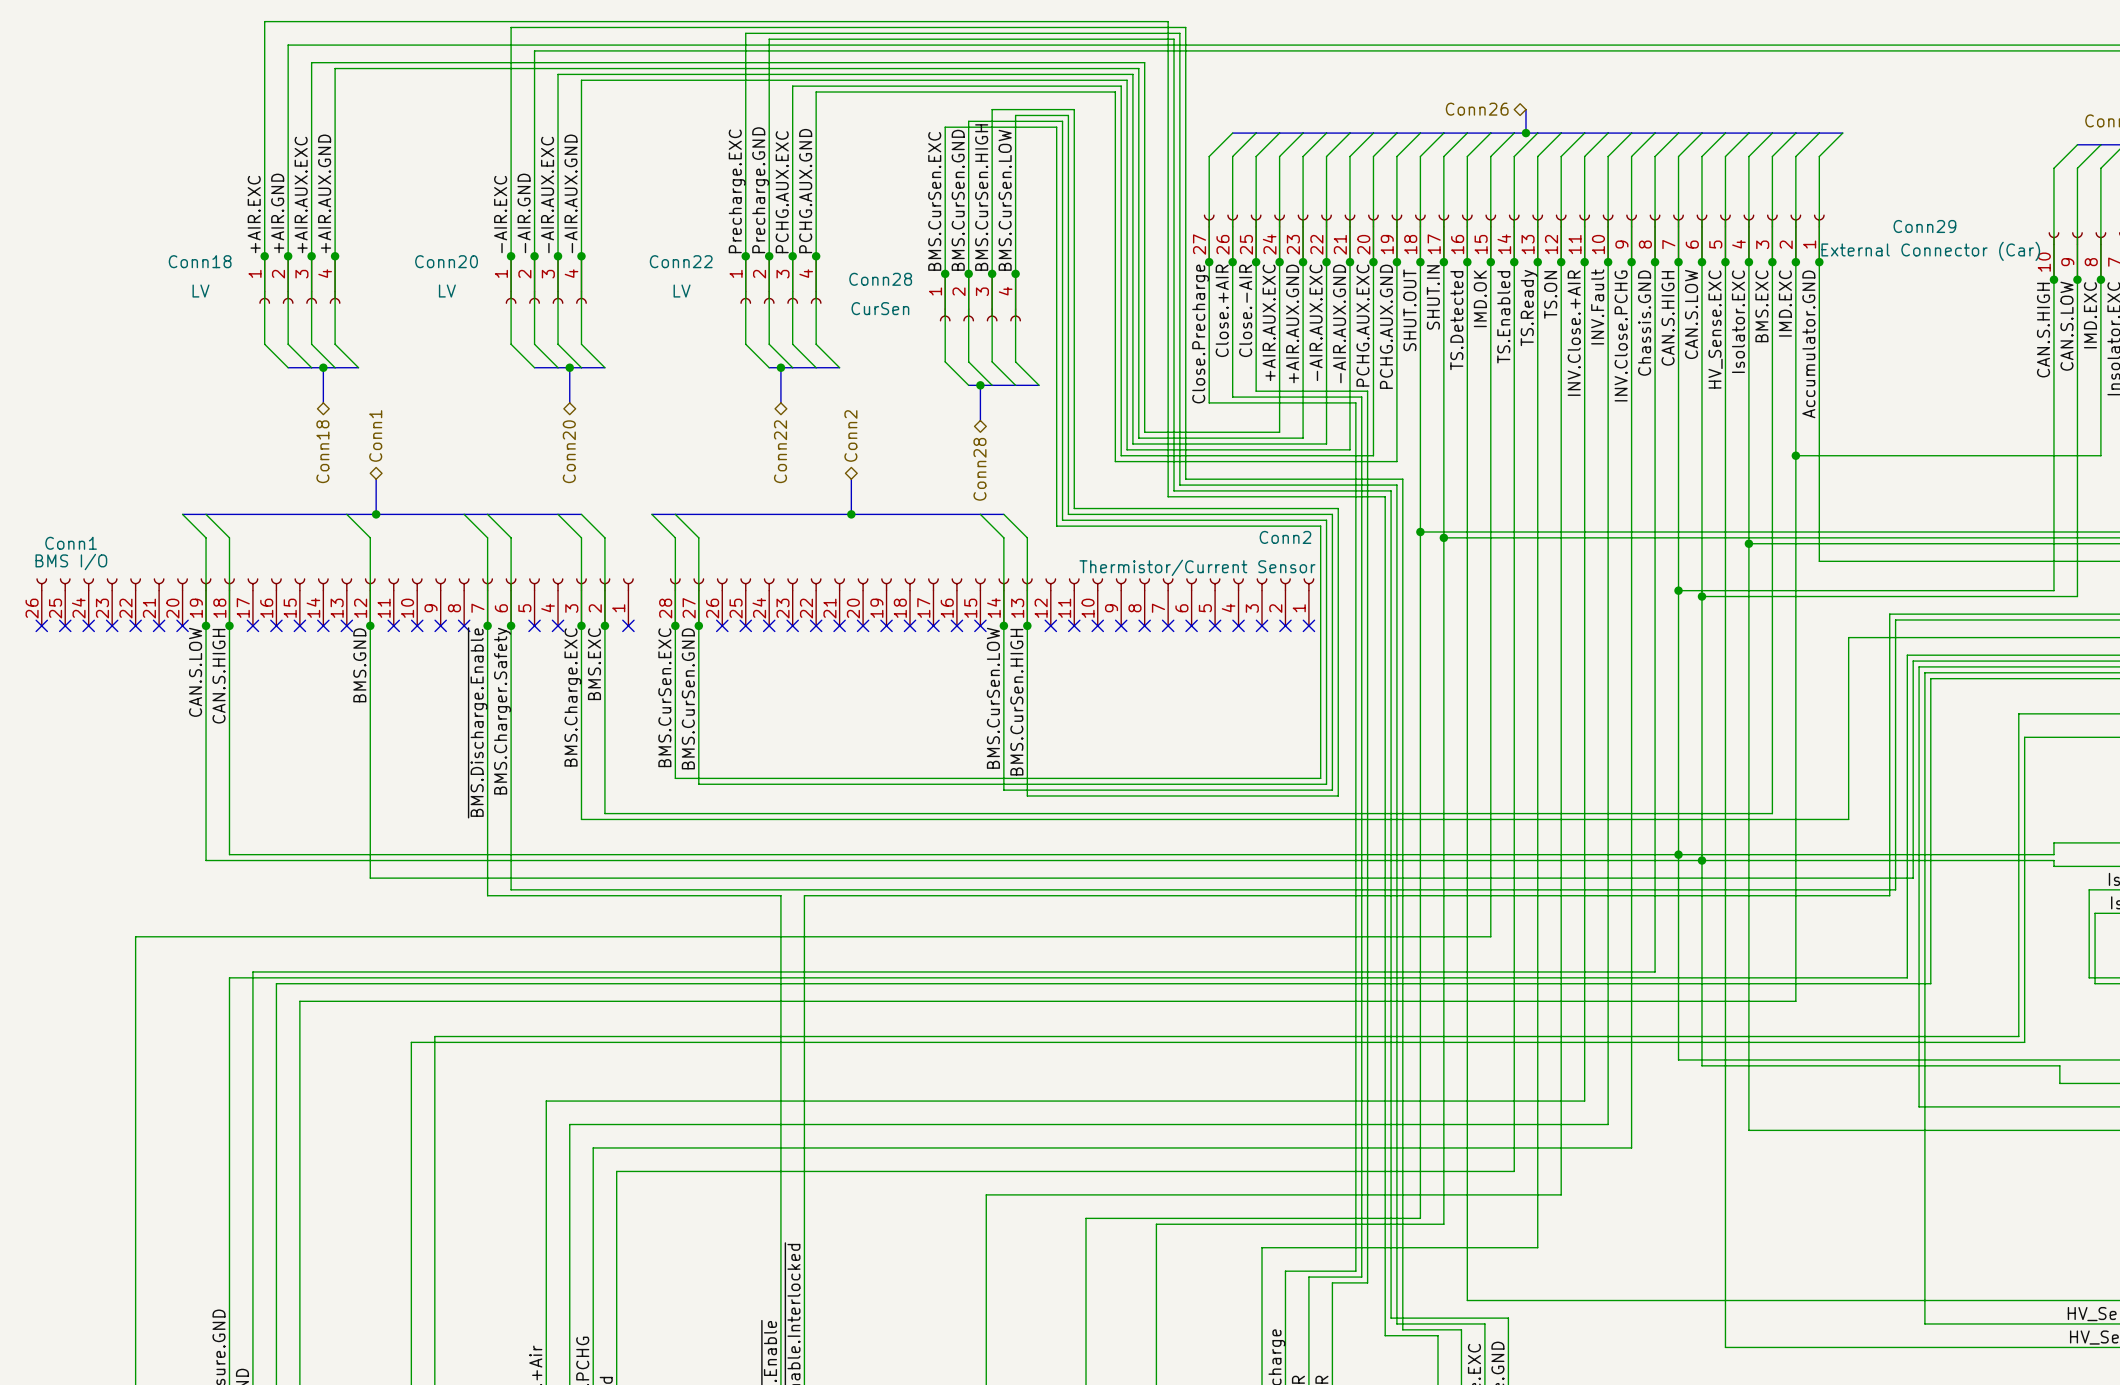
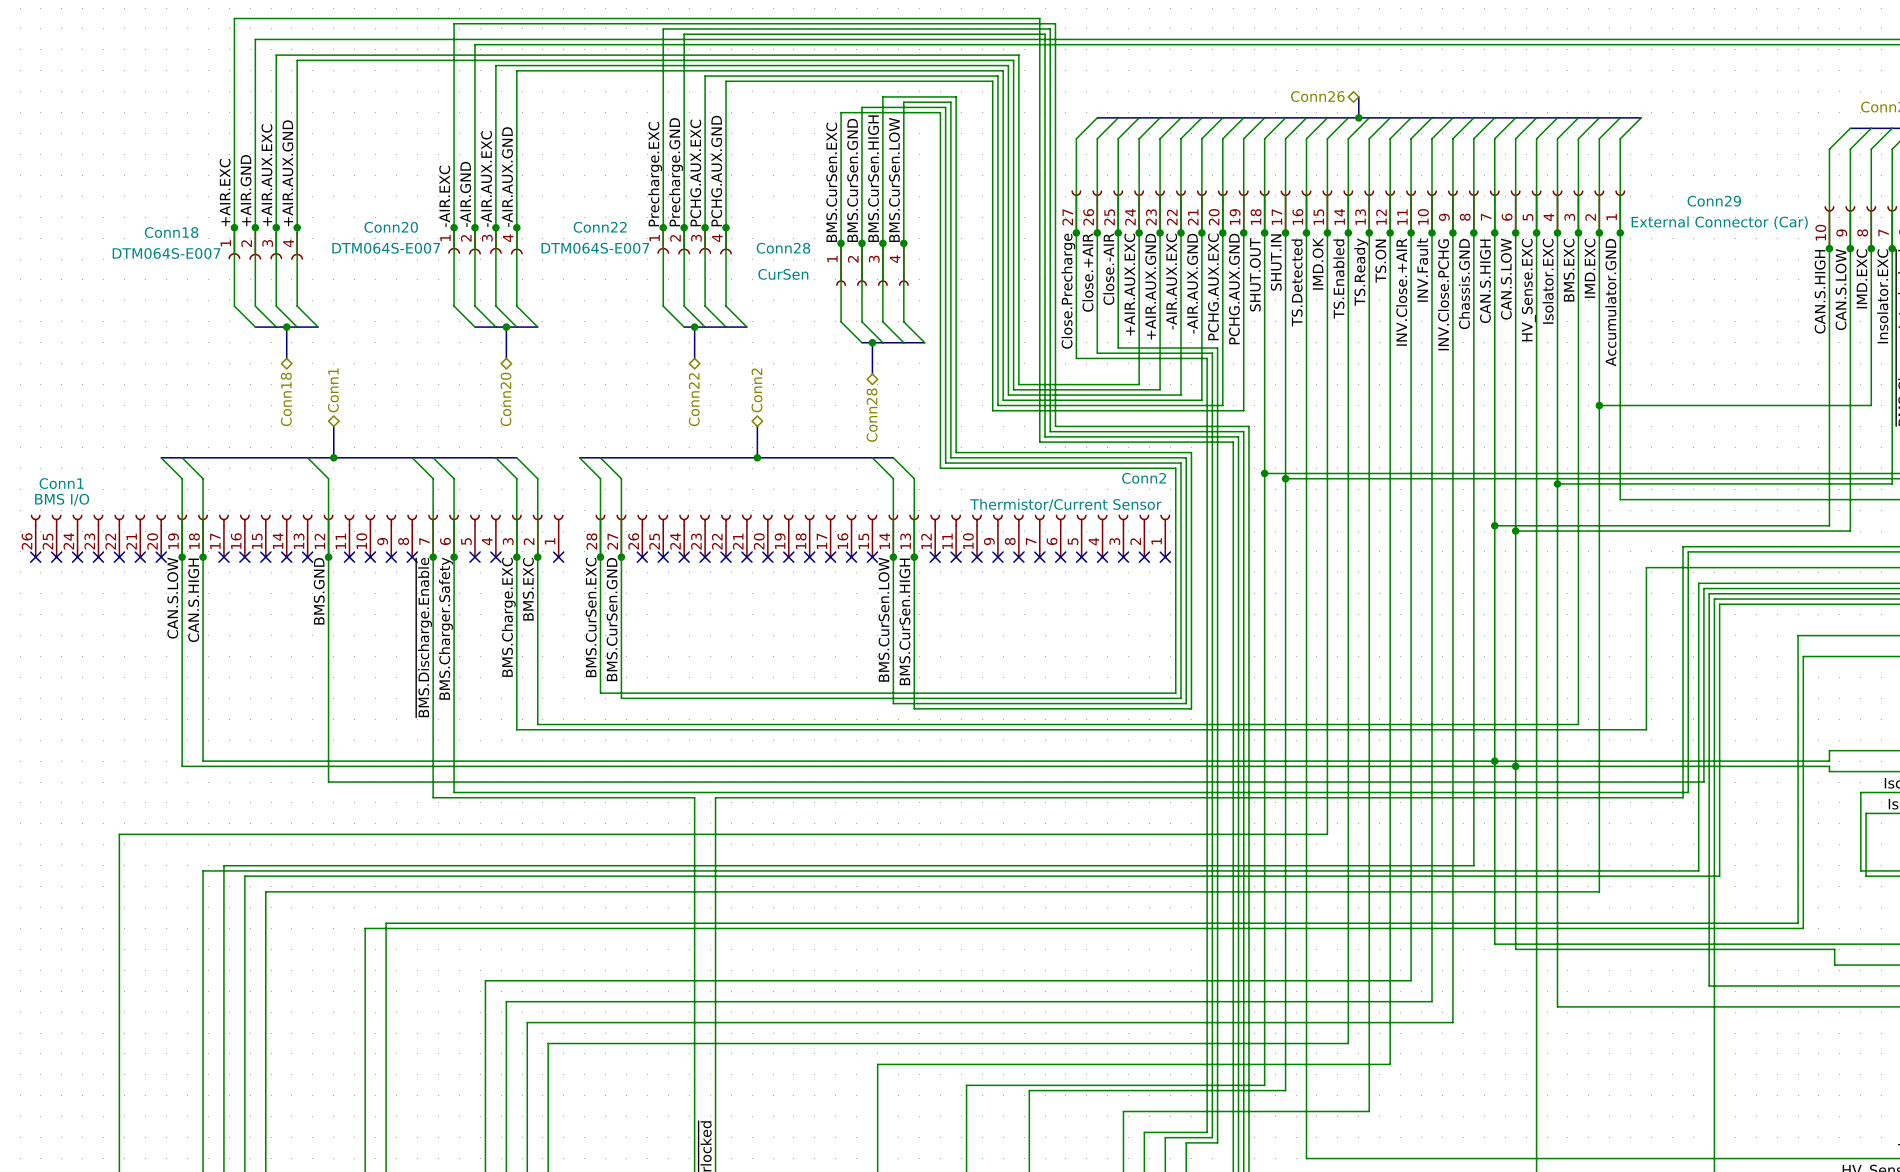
Conn18 symbol: [259, 256, 341, 304] -> [229, 232, 303, 260]
Conn20 symbol: [505, 256, 587, 304] -> [448, 227, 523, 254]
Conn22 symbol: [740, 256, 822, 304] -> [658, 227, 732, 254]
Conn20 text: none -> DTM064S-E007 (386, 248)
Conn22 text: none -> DTM064S-E007 (595, 248)
Conn18 text: none -> DTM064S-E007 (166, 253)
Conn18 value: LV (200, 291) -> none
Conn20 value: LV (447, 291) -> none
Conn22 value: LV (682, 291) -> none

